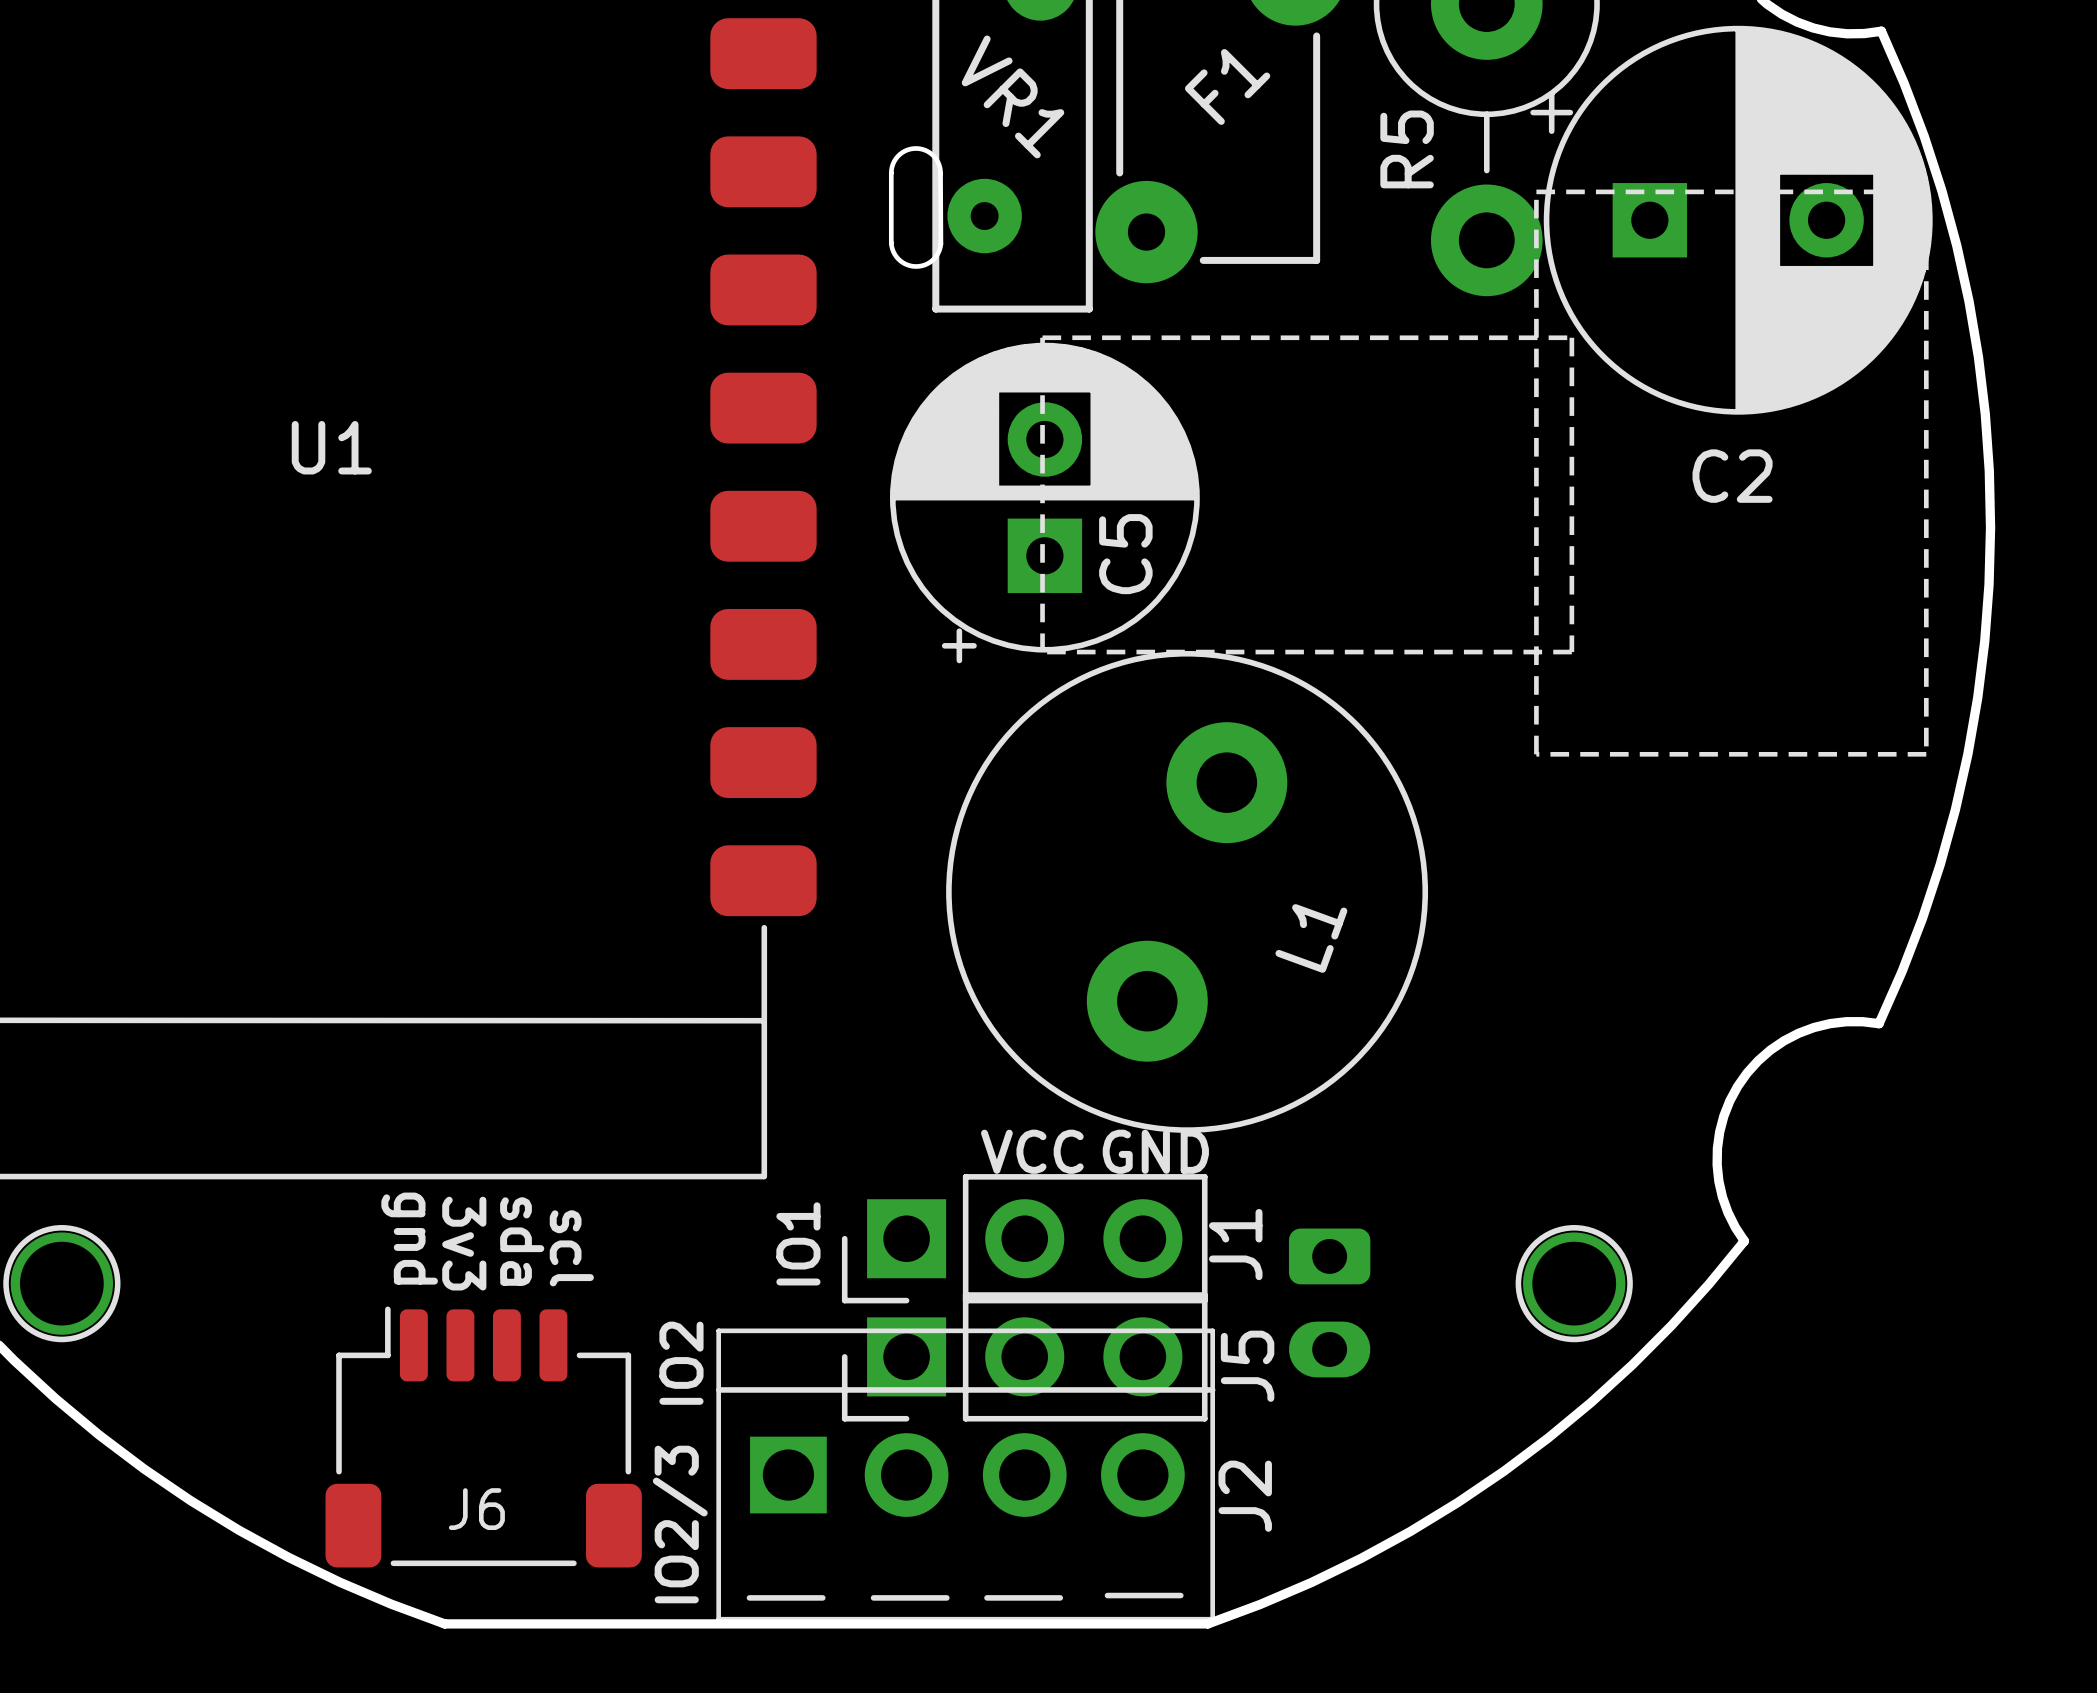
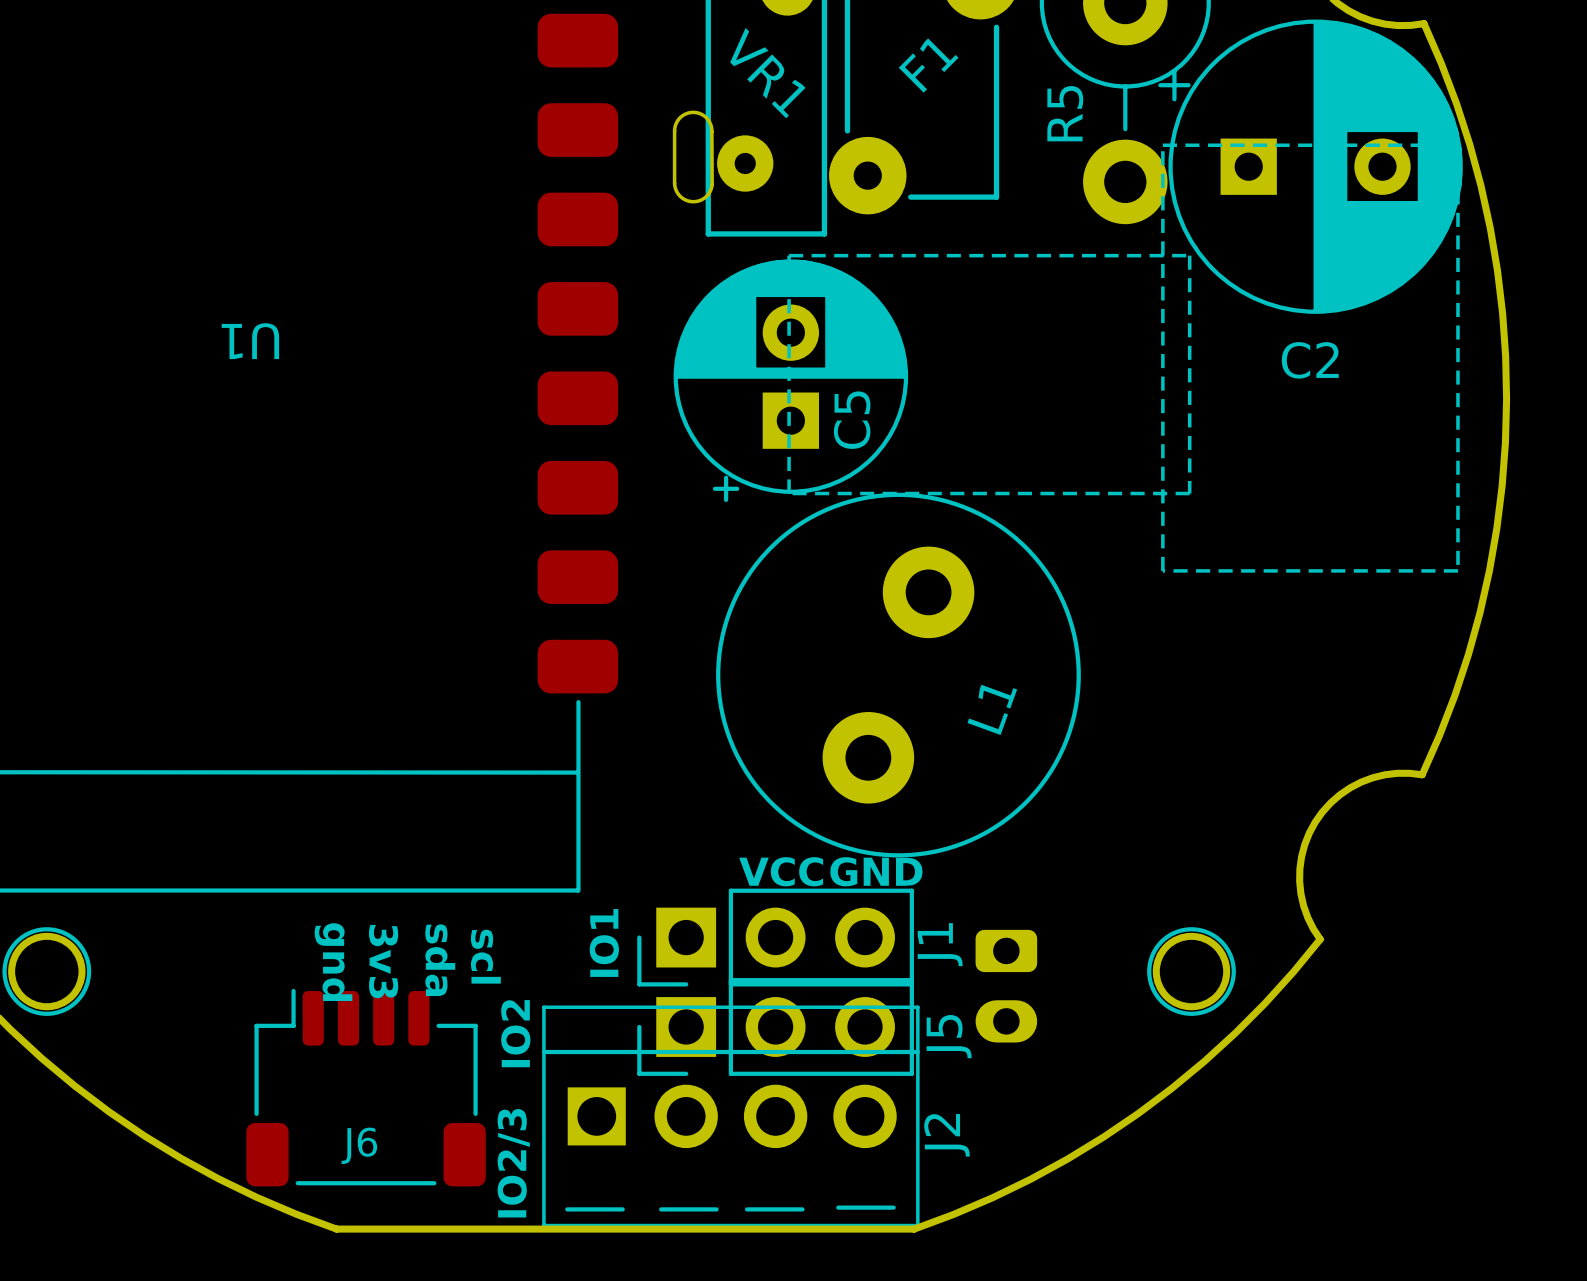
U1 name rotation: 0° (331, 447) -> 180° (250, 341)
text position: gnd (409, 1238) -> gnd (333, 962)
text: sda (522, 1241) -> none
text position: 3v3 (464, 1243) -> 3v3 (383, 961)
text: scl (571, 1248) -> sda (440, 960)
text: none -> scl (485, 956)

